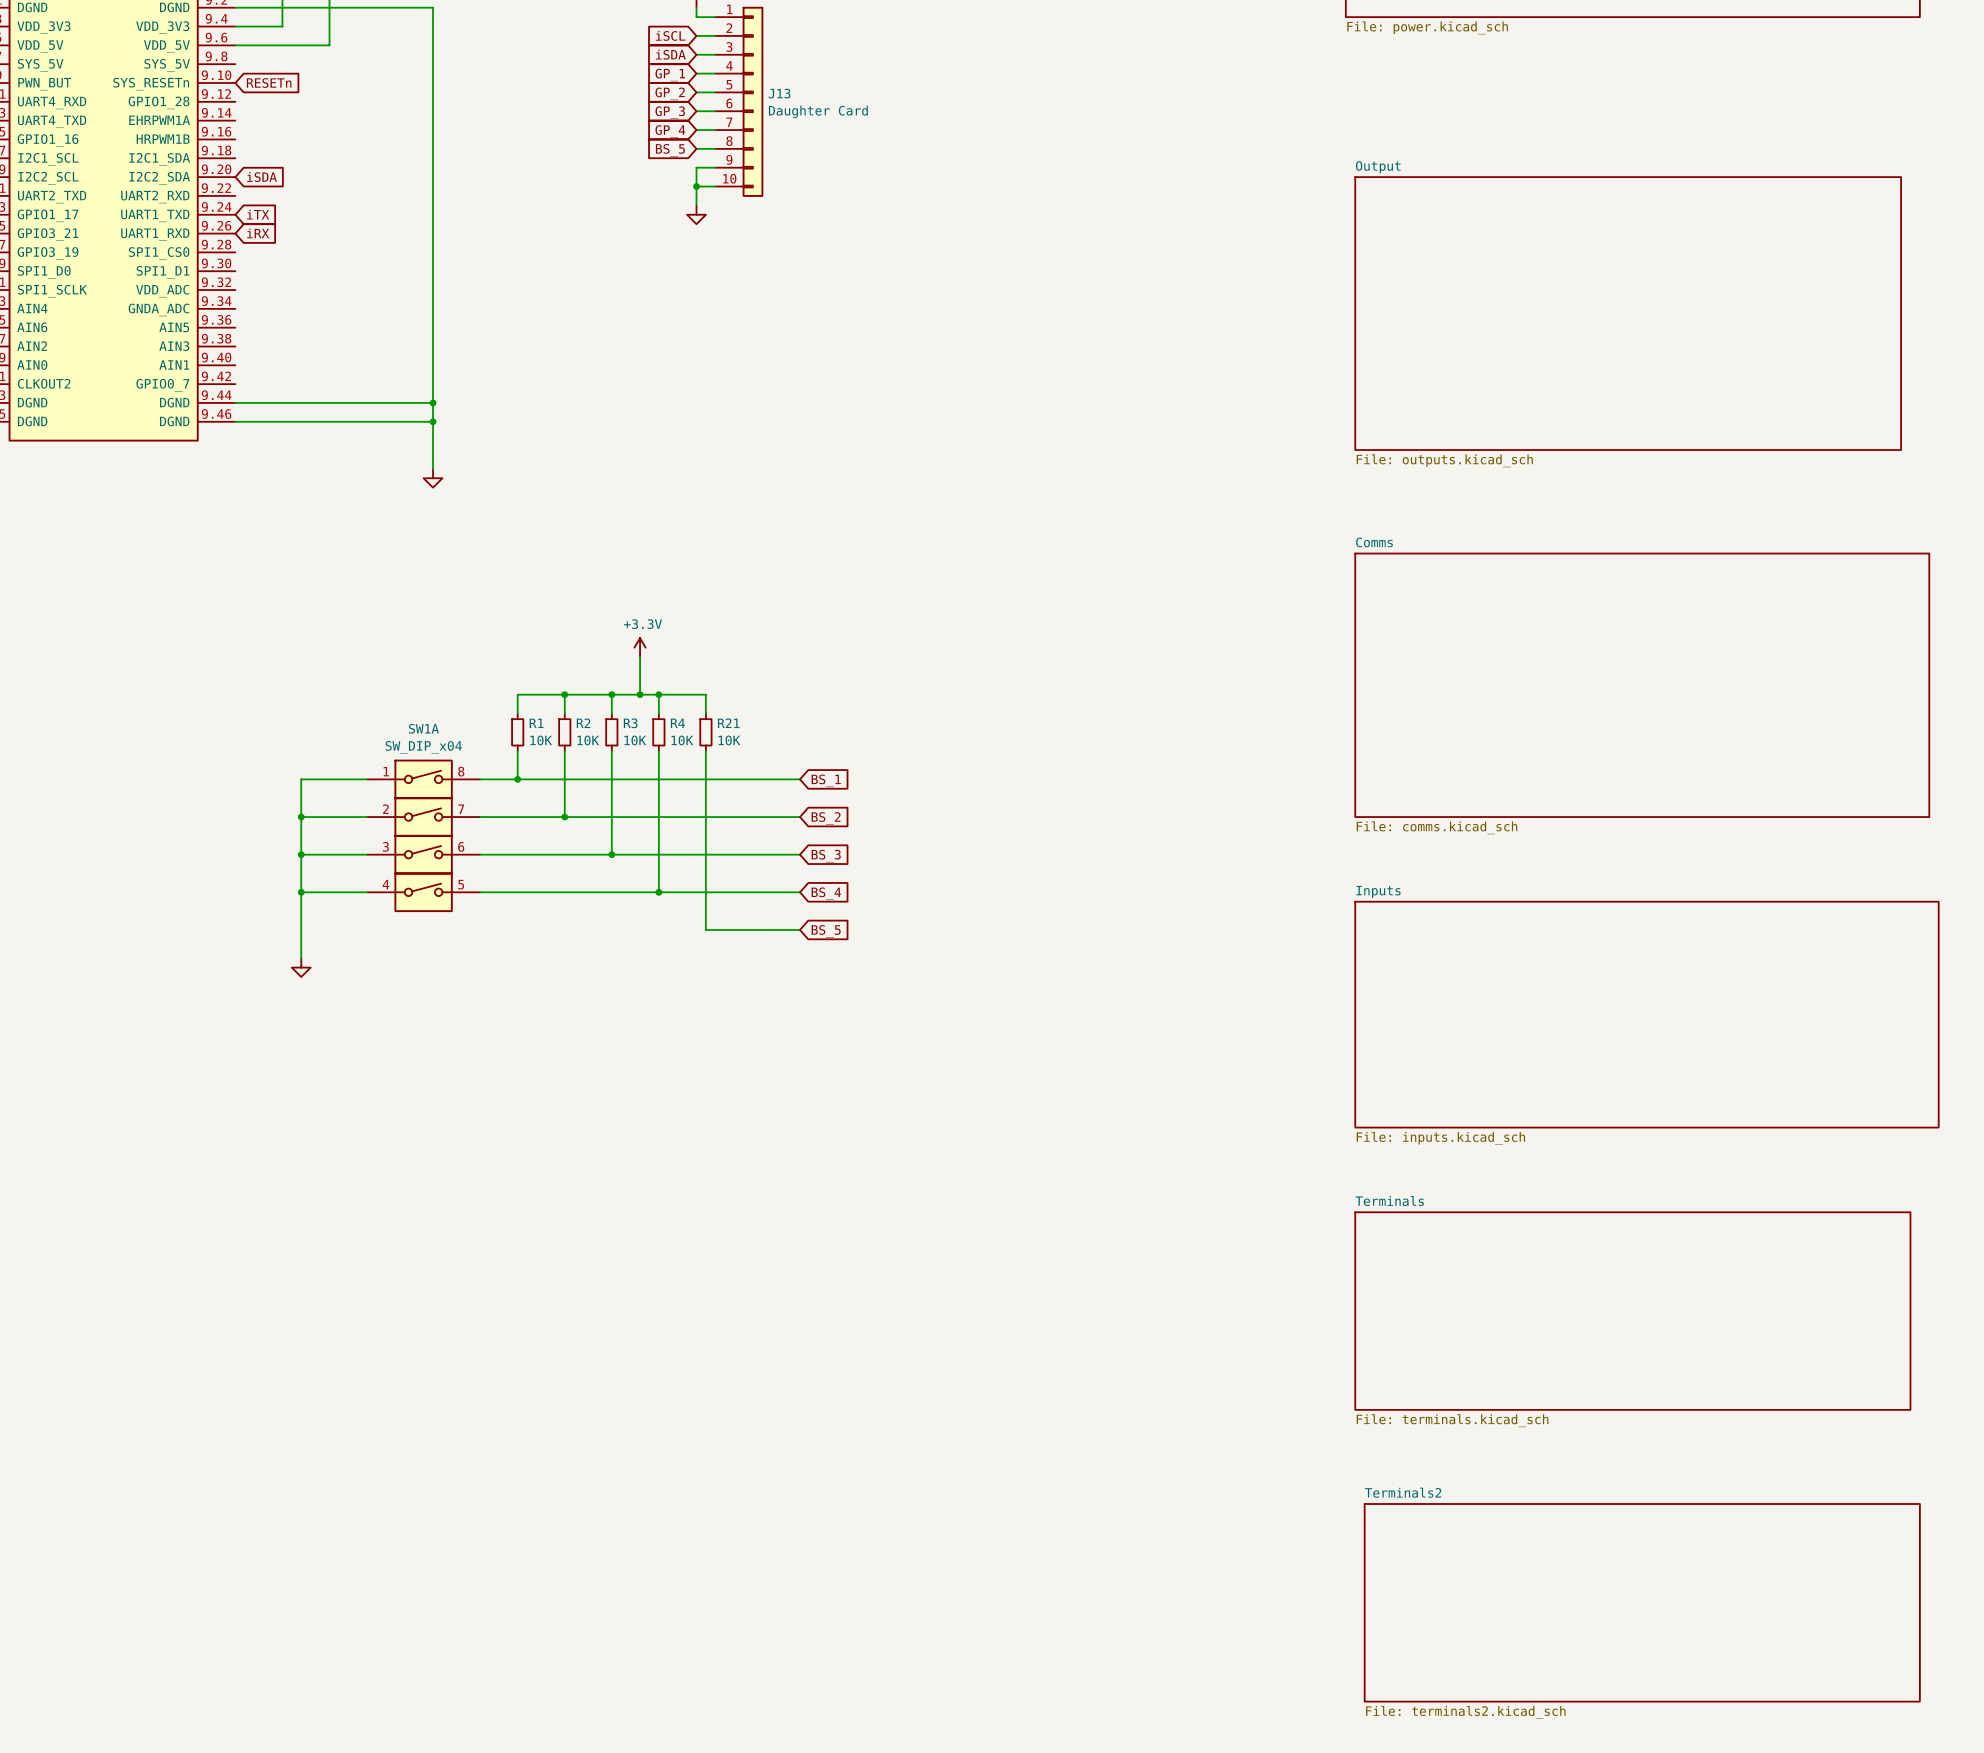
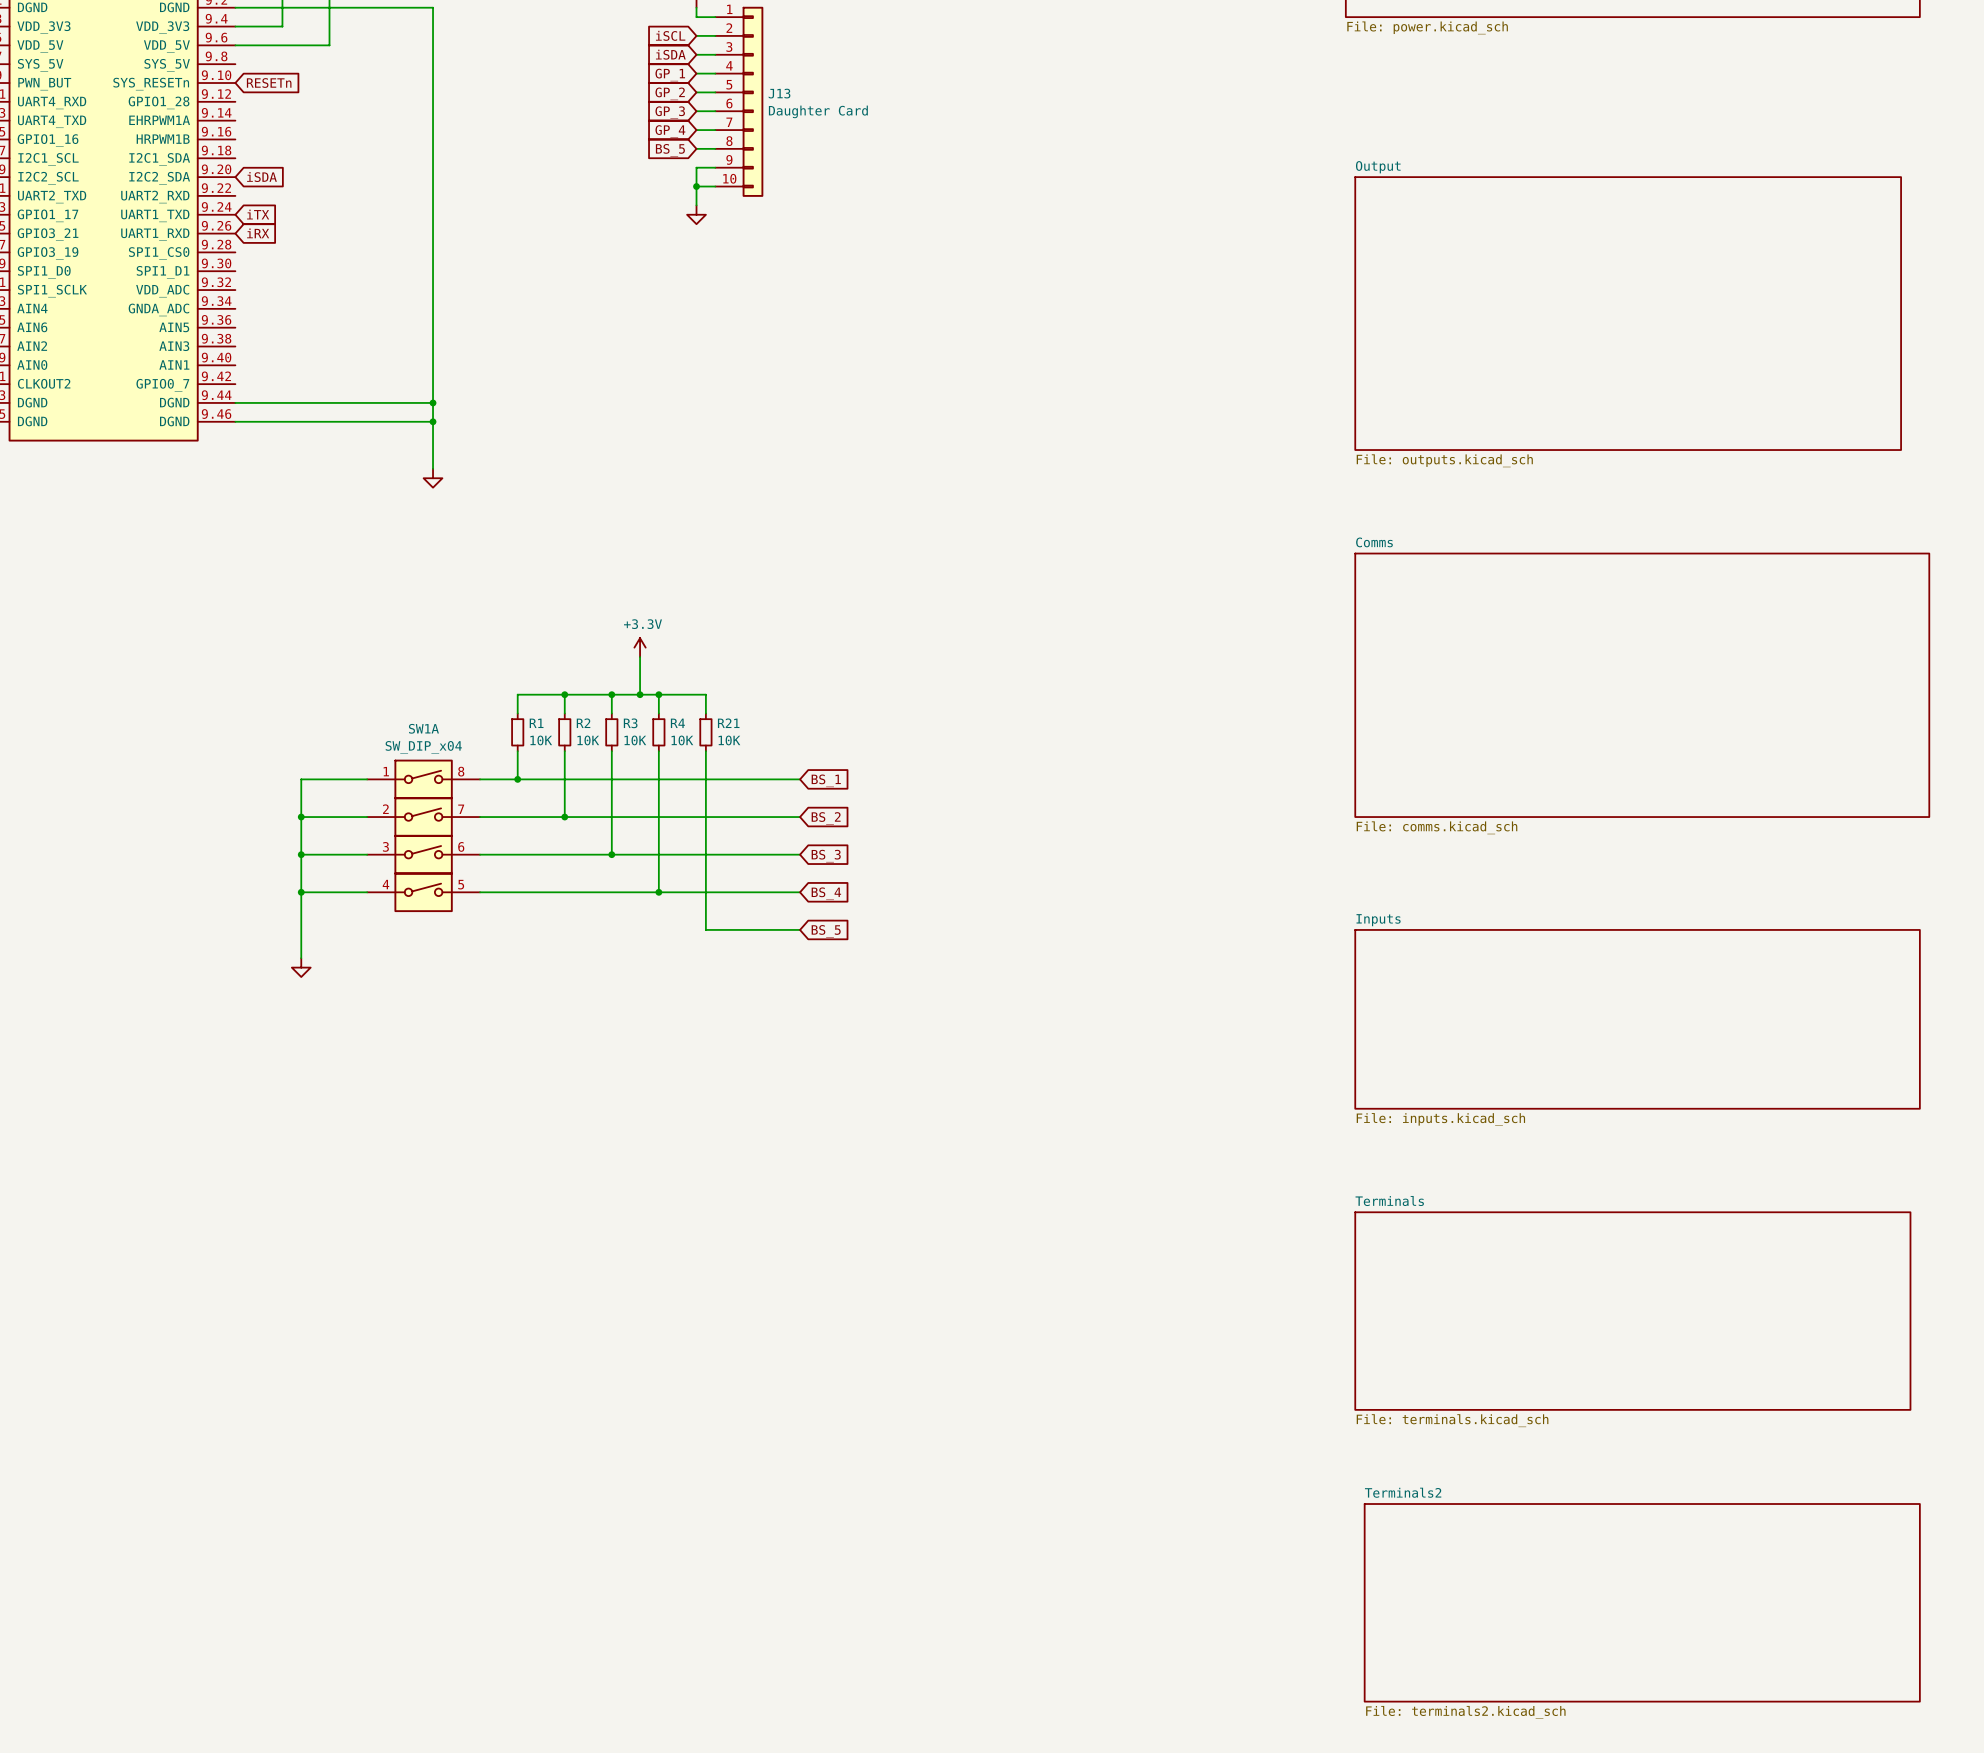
sheet Inputs: File: inputs.kicad_sch (1646, 1014) -> none
sheet Inputs: none -> File: inputs.kicad_sch (1637, 1019)

